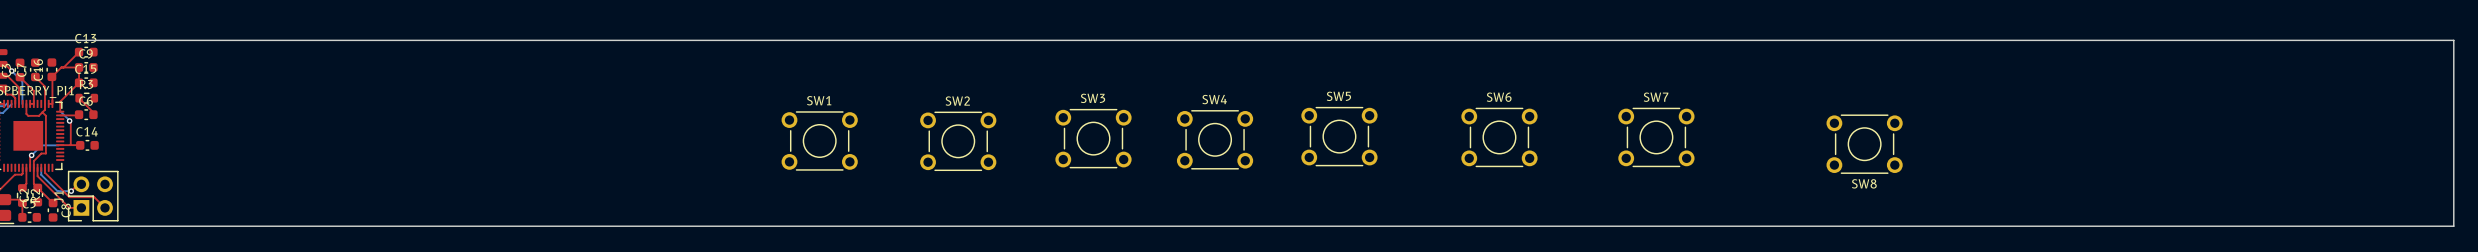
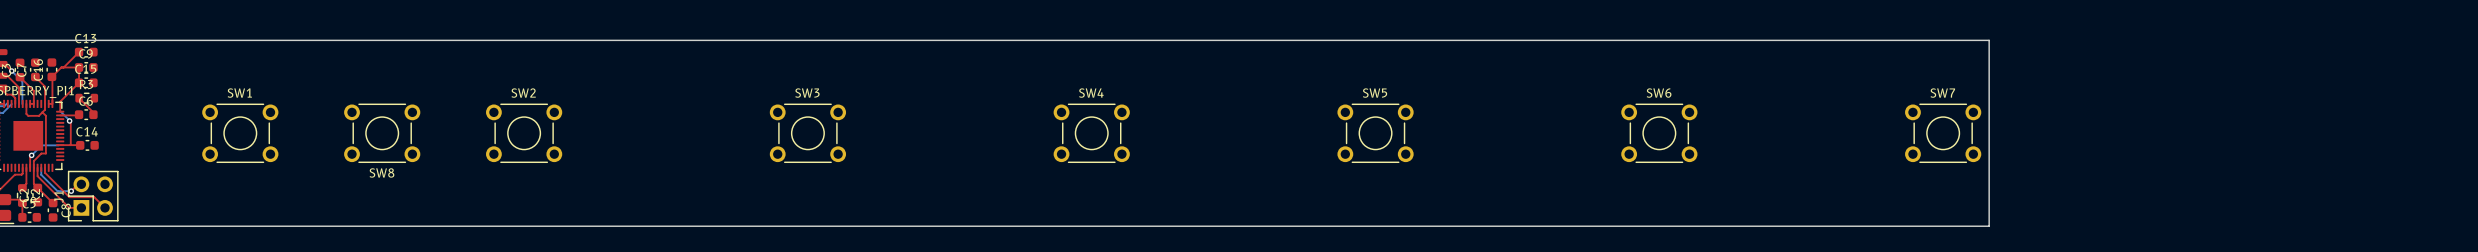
board edge: (1989, 40) (2453, 40) (2453, 226) (1989, 226) -> (1989, 40) (1989, 226)
SW5 position: (1339, 136) -> (1375, 133)
SW6 position: (1499, 137) -> (1659, 133)
SW7 position: (1656, 137) -> (1943, 133)
SW3 position: (1093, 138) -> (807, 133)
SW4 position: (1215, 139) -> (1091, 133)
SW1 position: (819, 140) -> (240, 133)
SW2 position: (958, 141) -> (524, 133)
SW8 position: (1864, 144) -> (382, 133)

